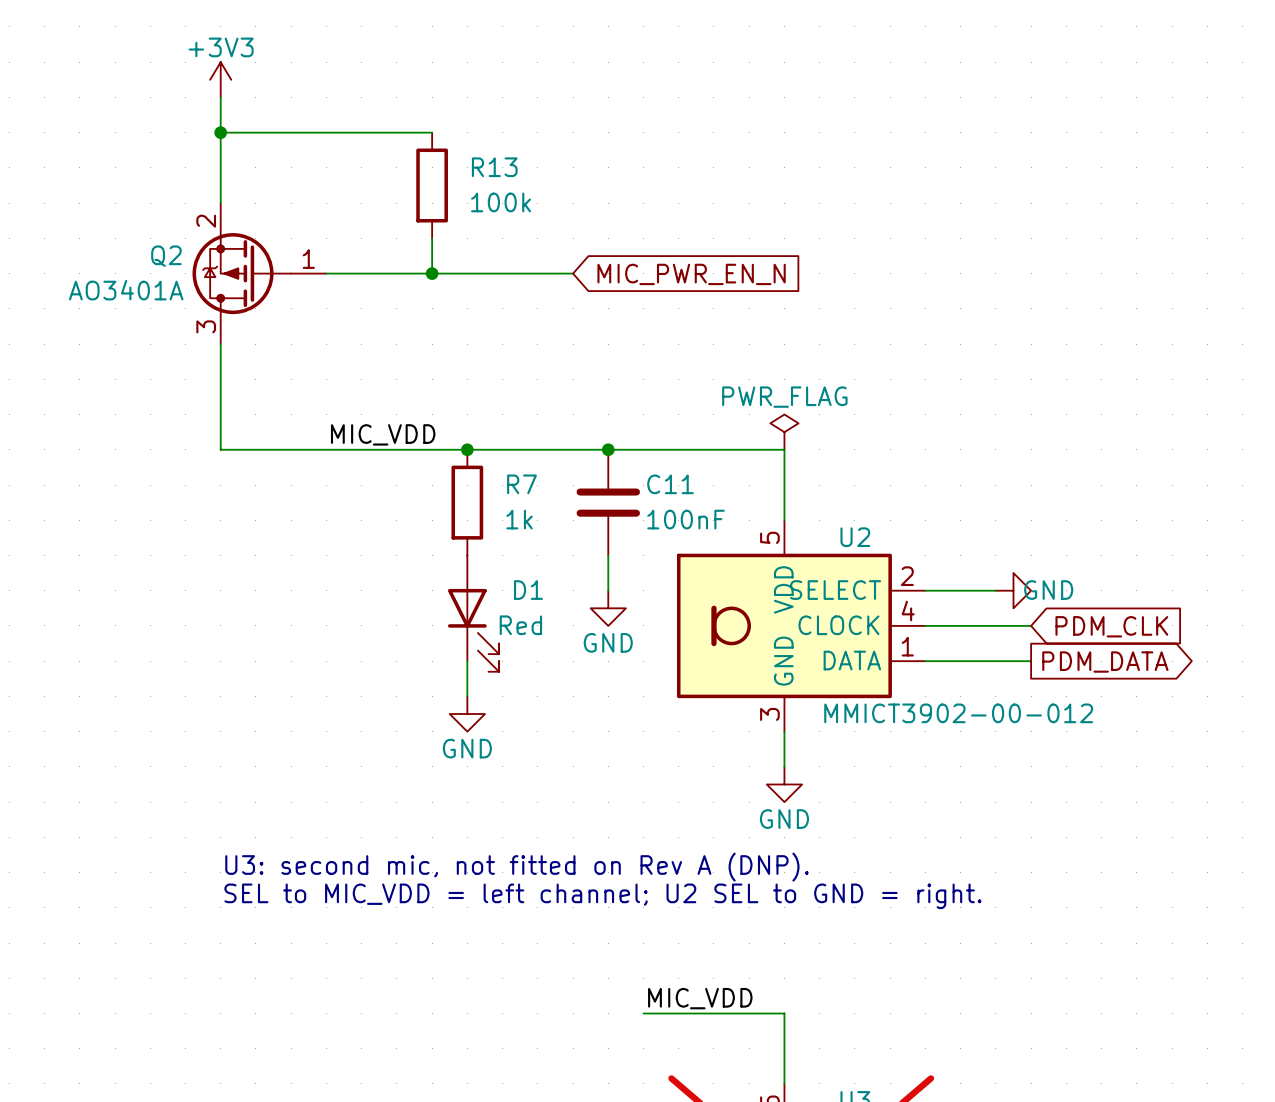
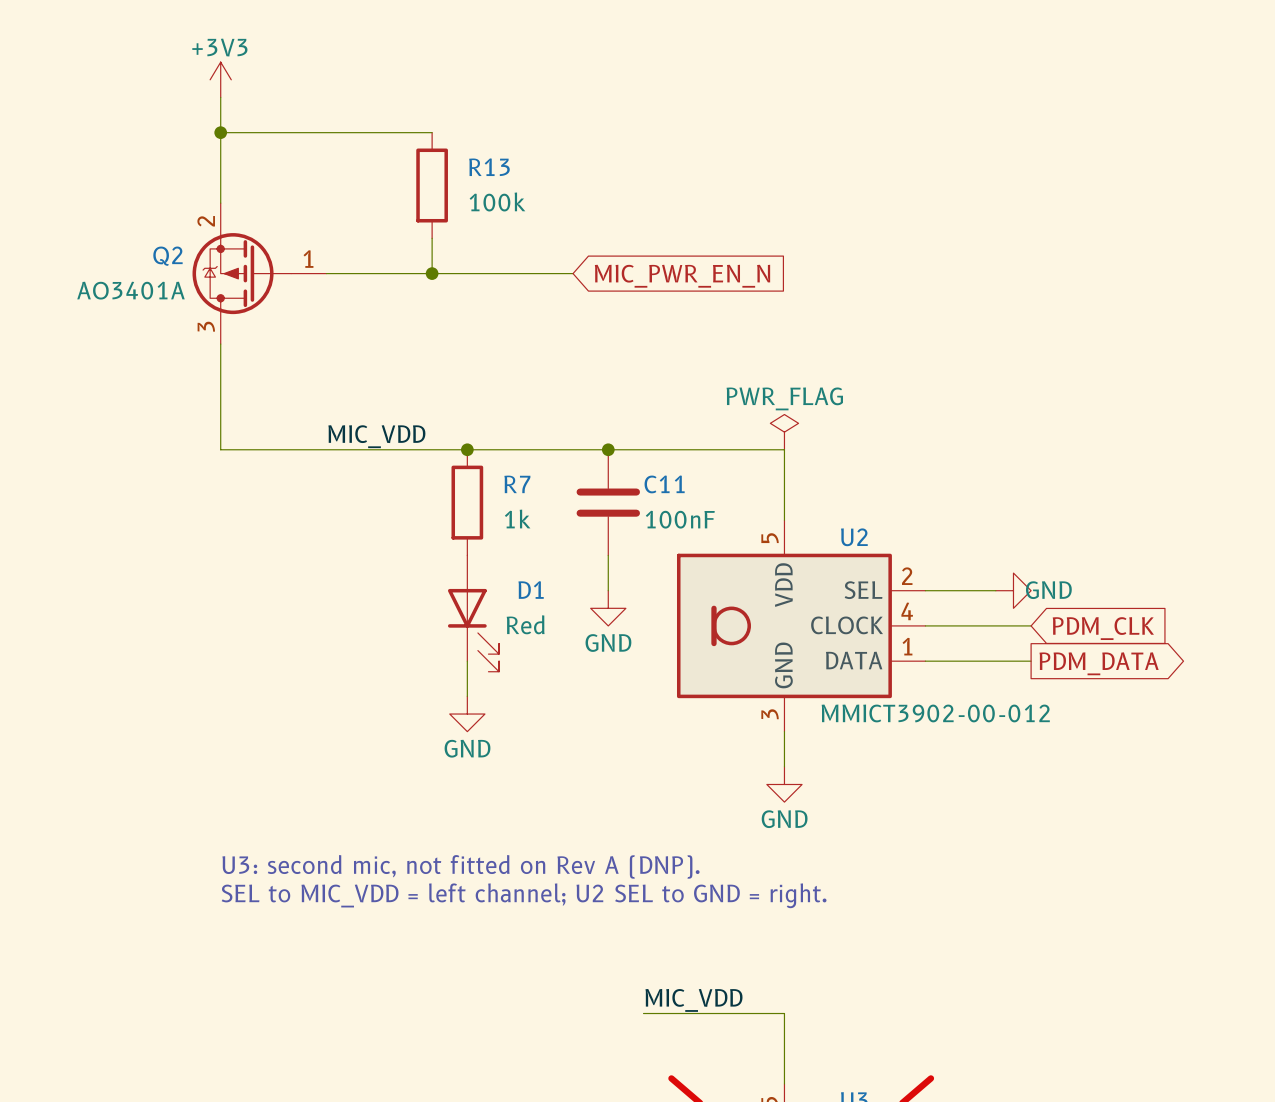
U2 pin name: SELECT (835, 590) -> SEL (863, 590)

